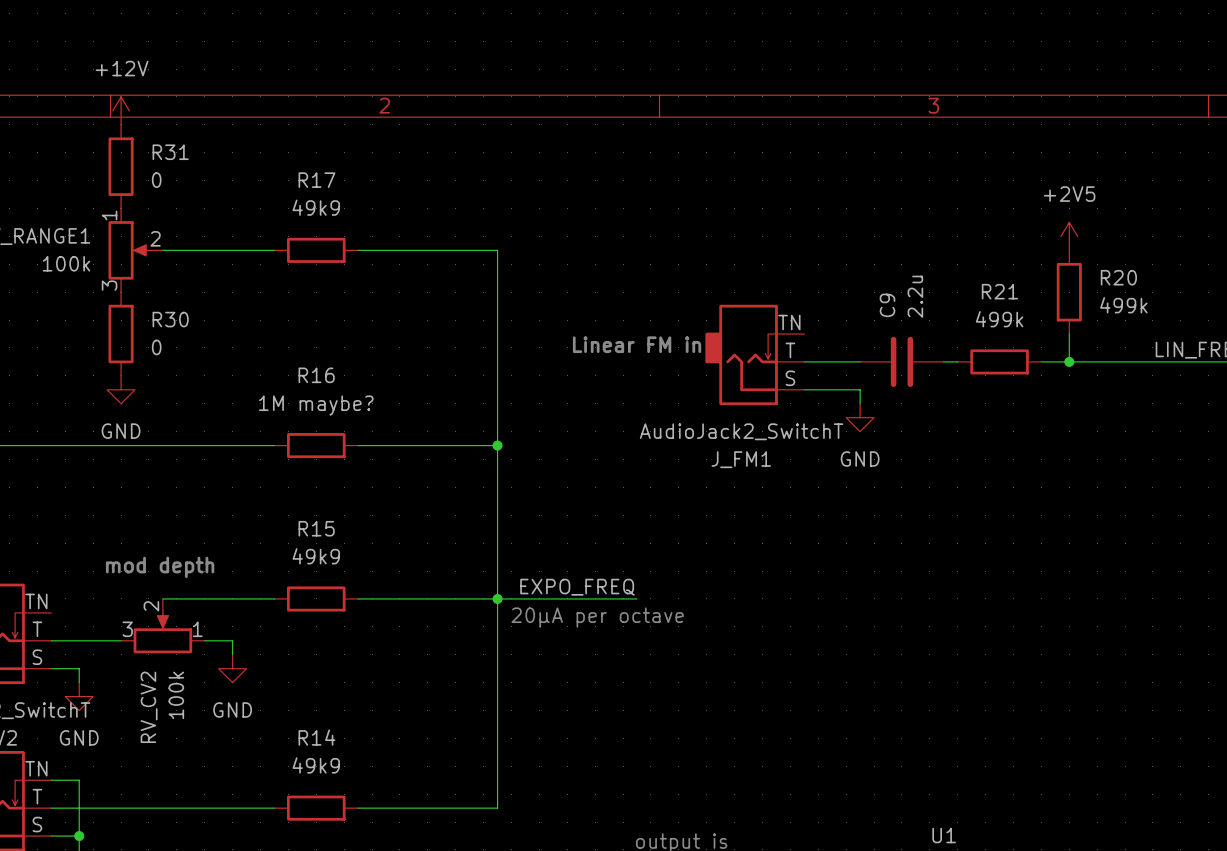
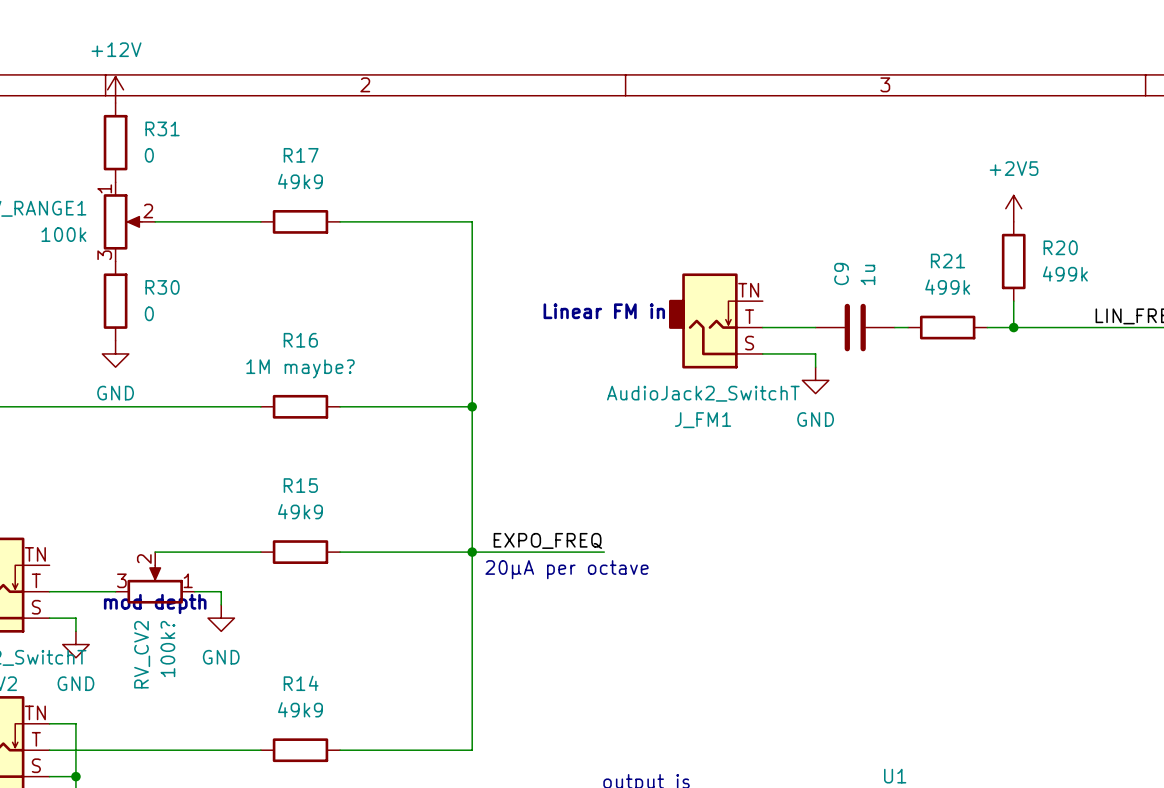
C9 value: 2.2u (915, 296) -> 1u (867, 274)
text position: mod depth (160, 567) -> mod depth (155, 604)
RV_CV2 value: 100k (176, 695) -> 100k? (167, 649)

